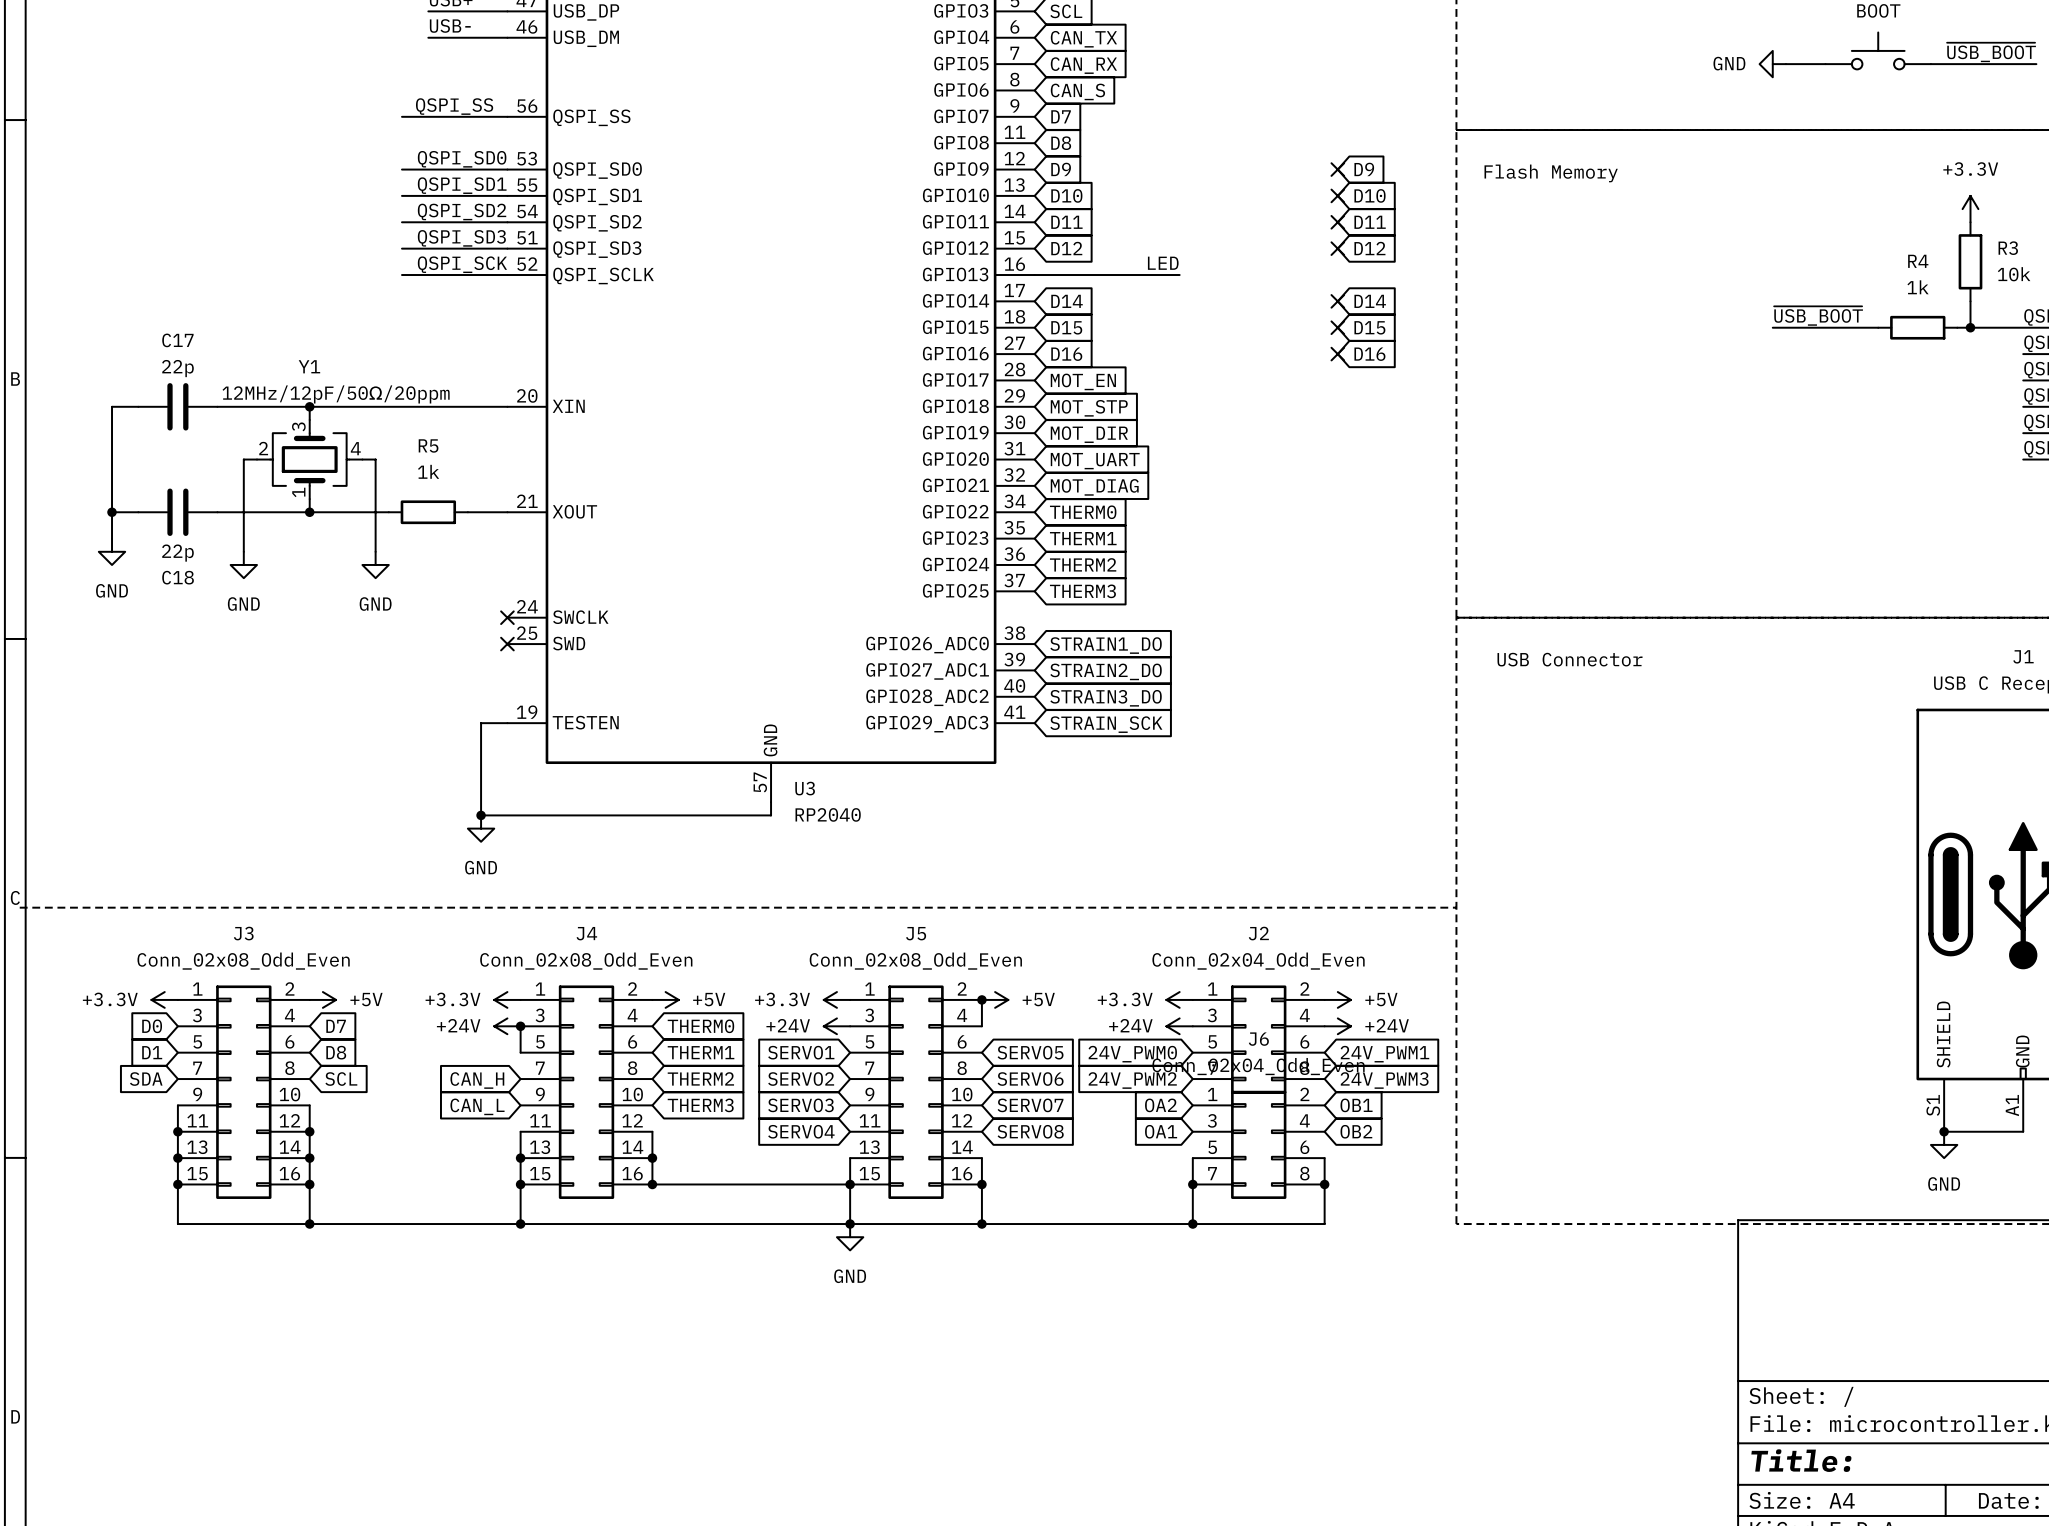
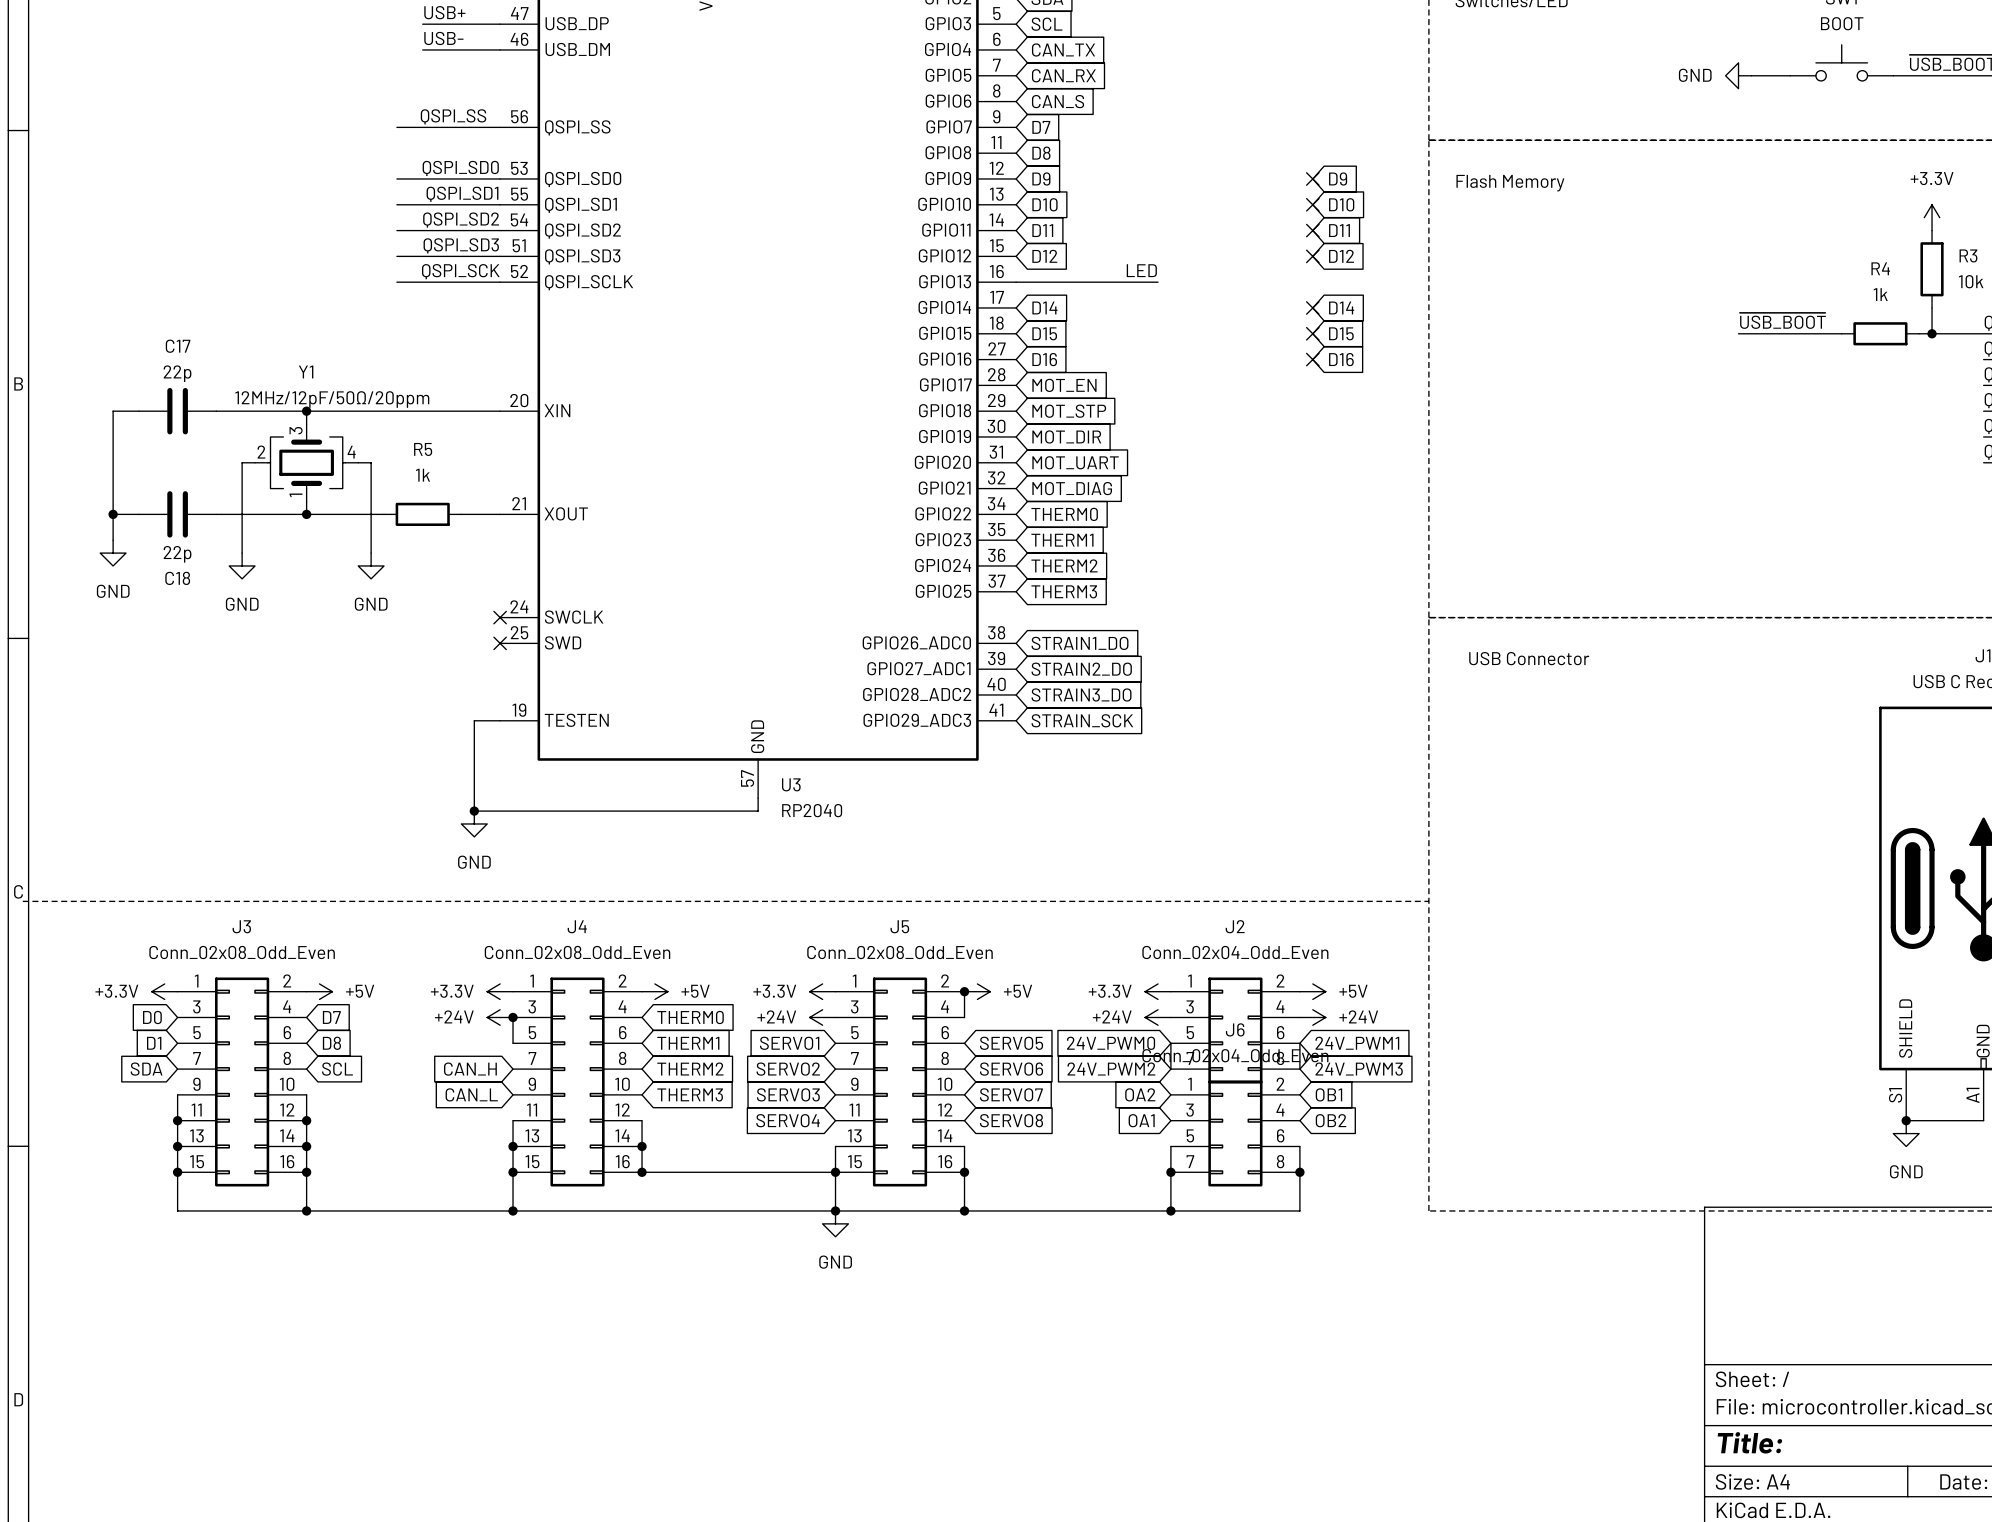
wire: none -> (1170, 1043) (1170, 1069)
wire: none -> (1299, 1043) (1299, 1069)

